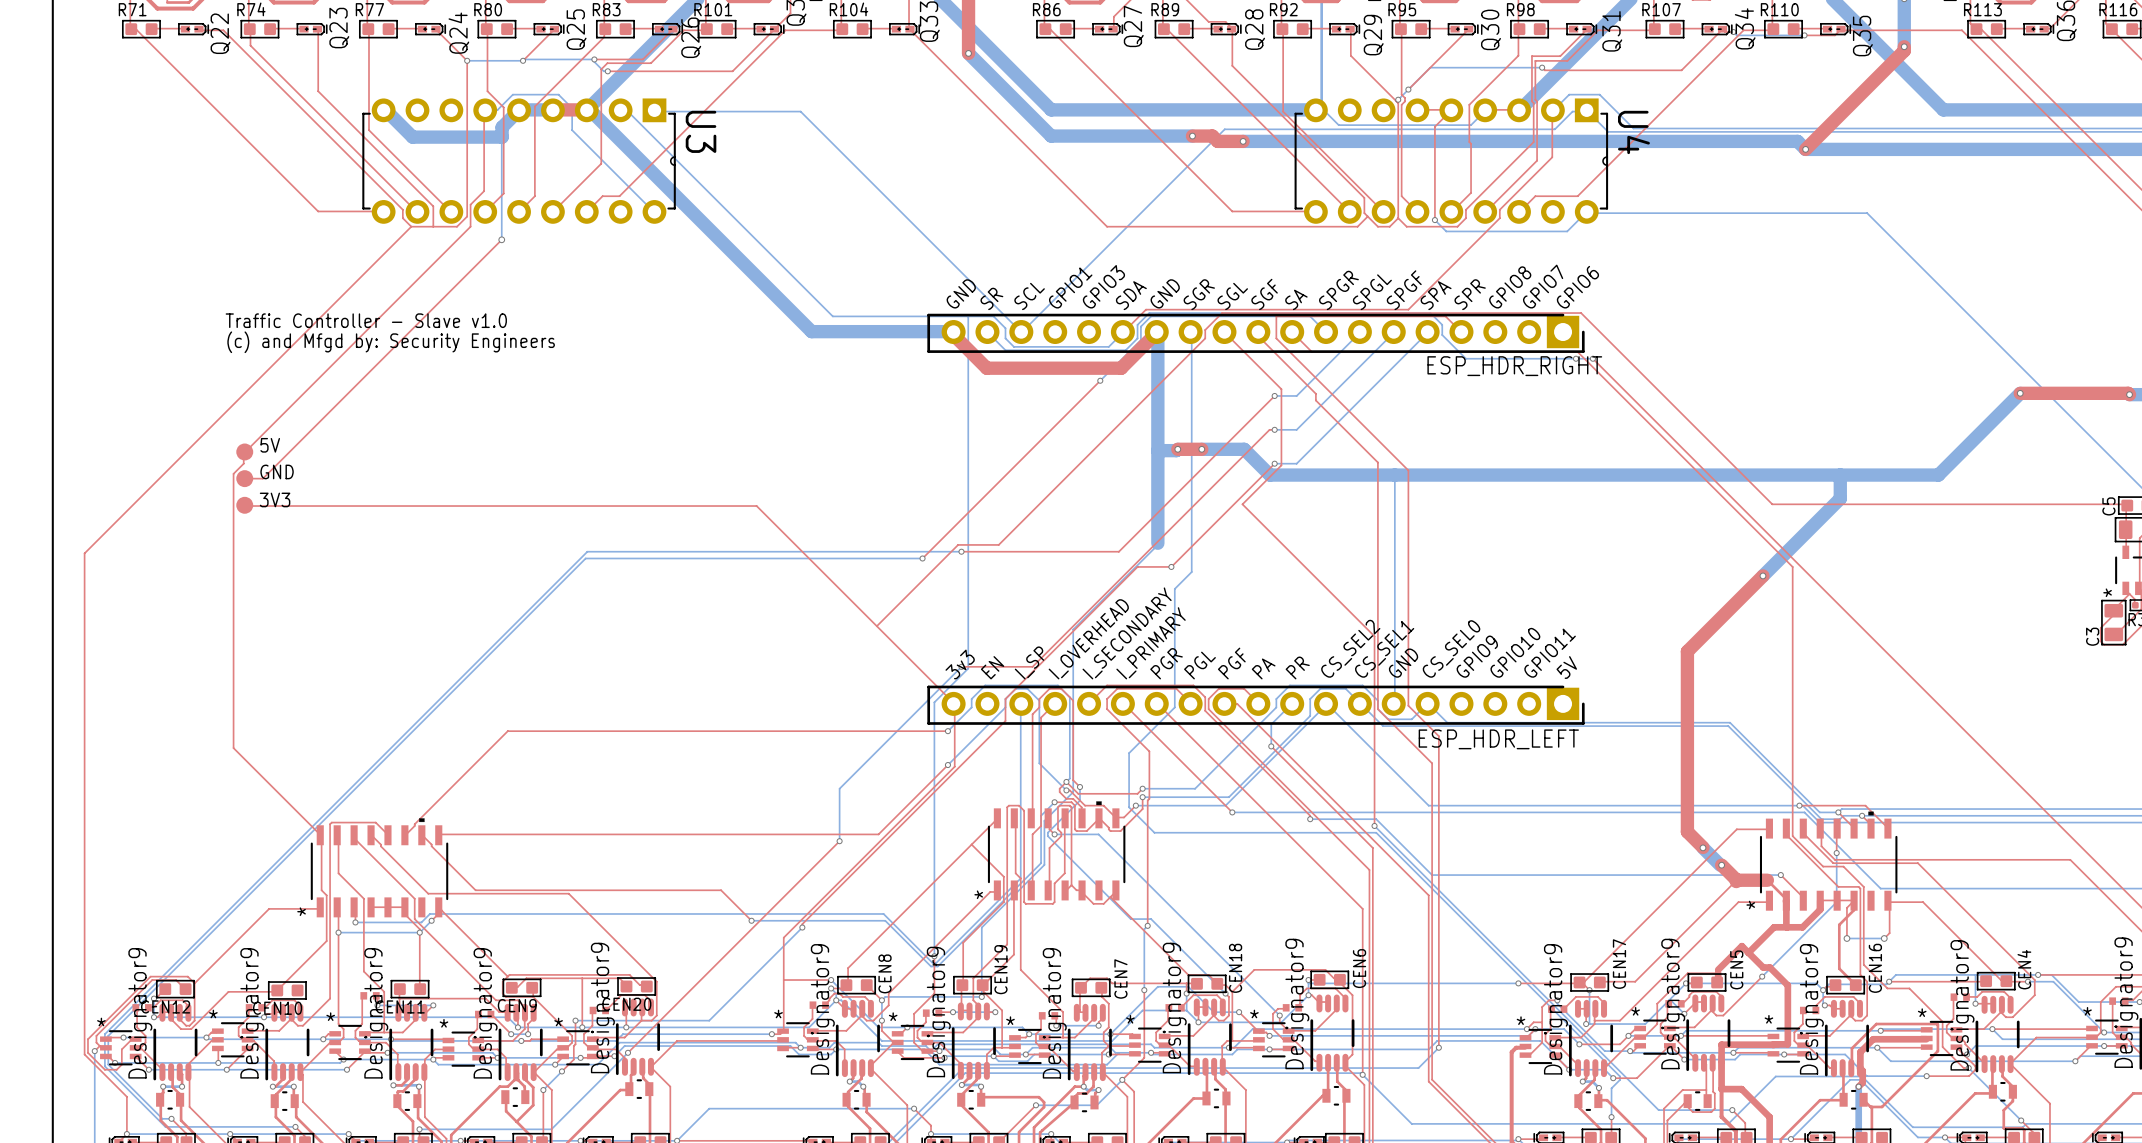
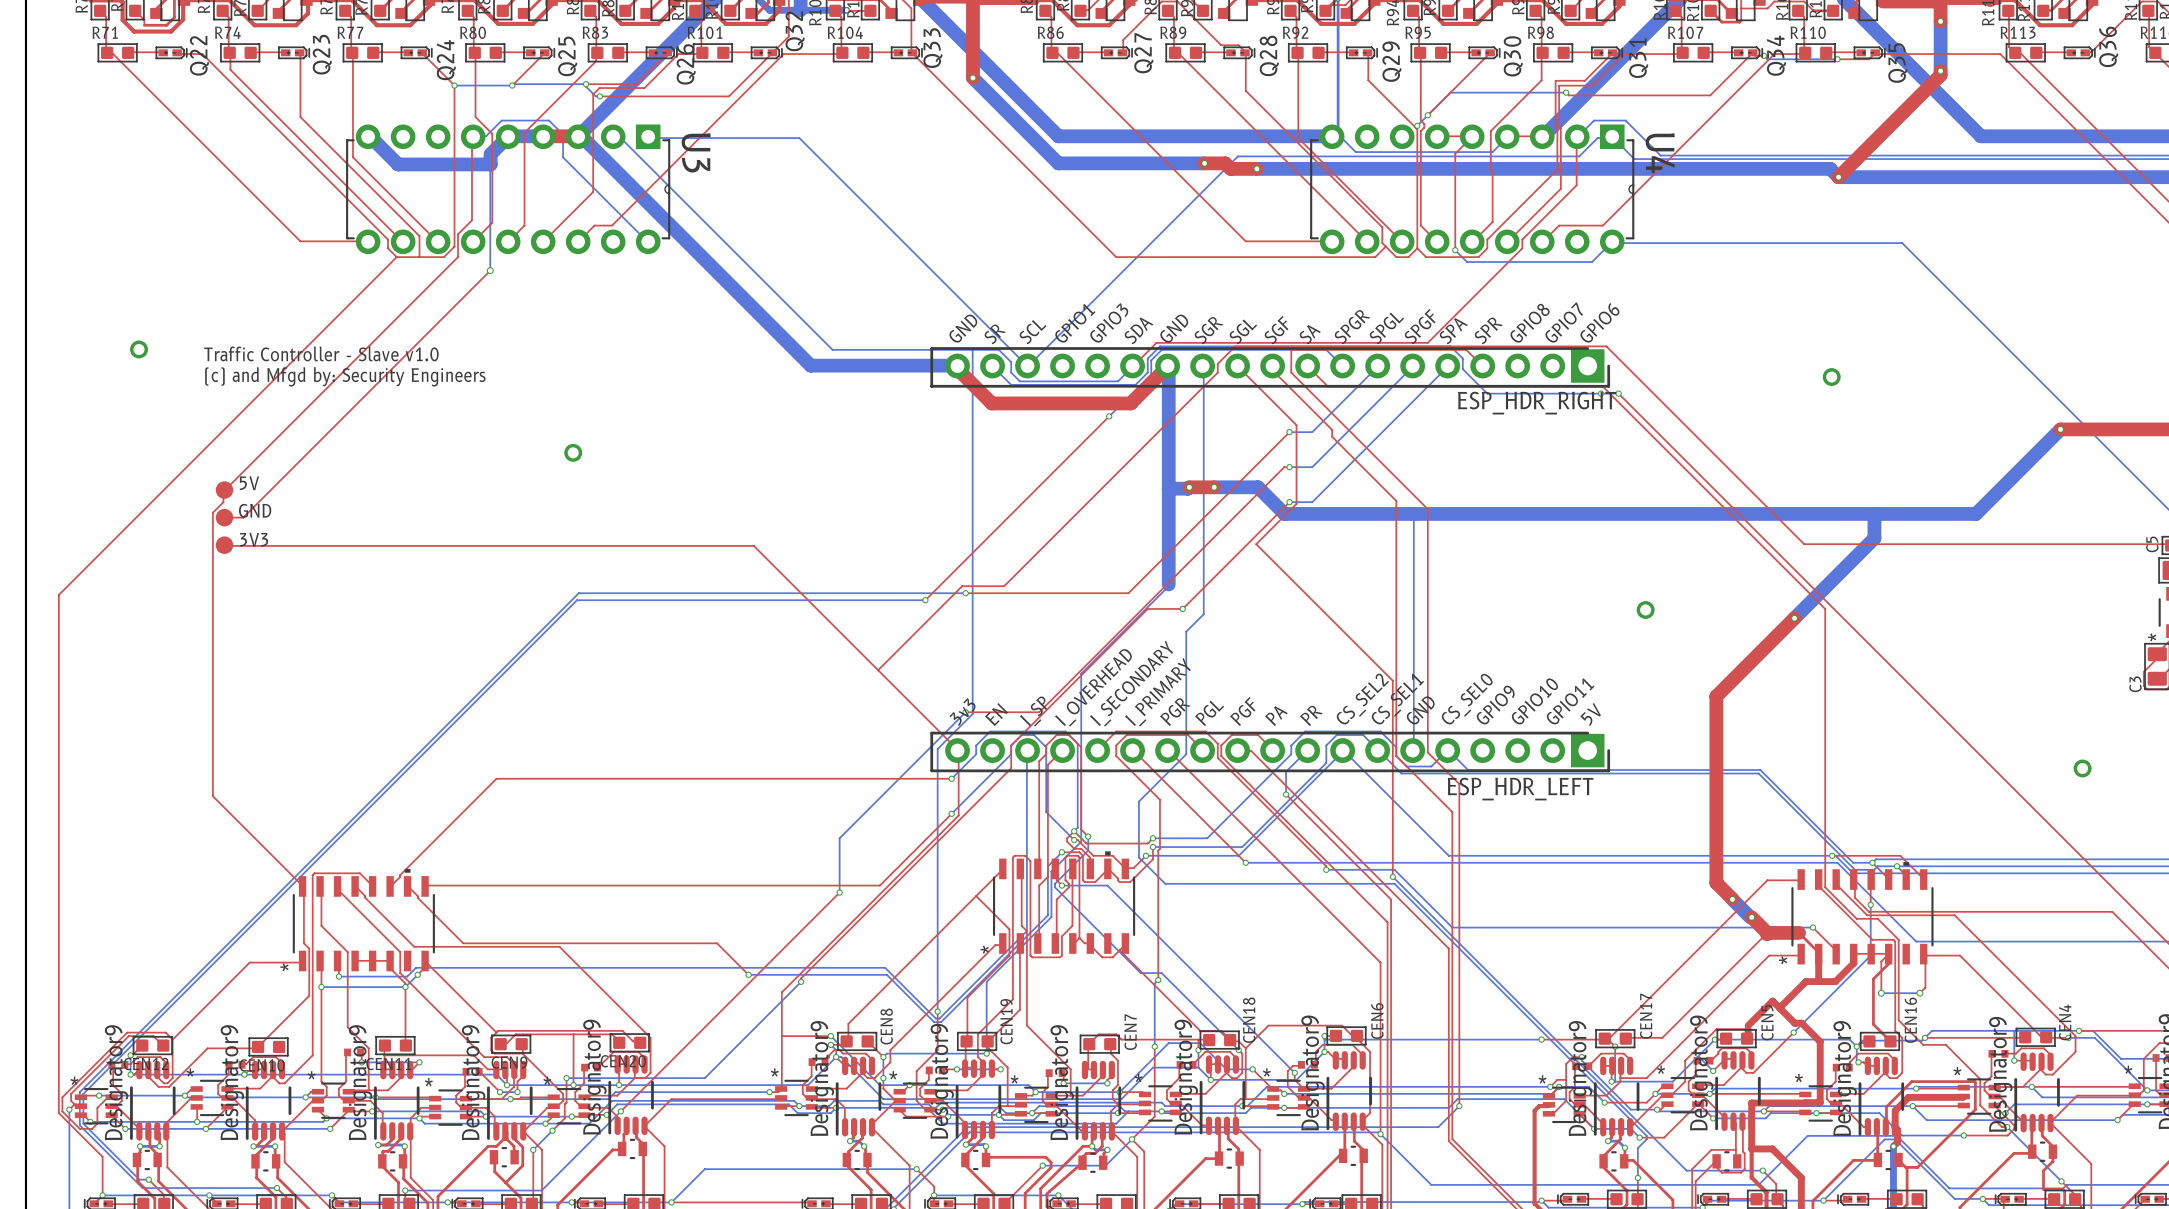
via: none -> (139, 349)
via: none -> (1831, 377)
via: none -> (573, 452)
via: none -> (1645, 609)
via: none -> (2082, 768)

